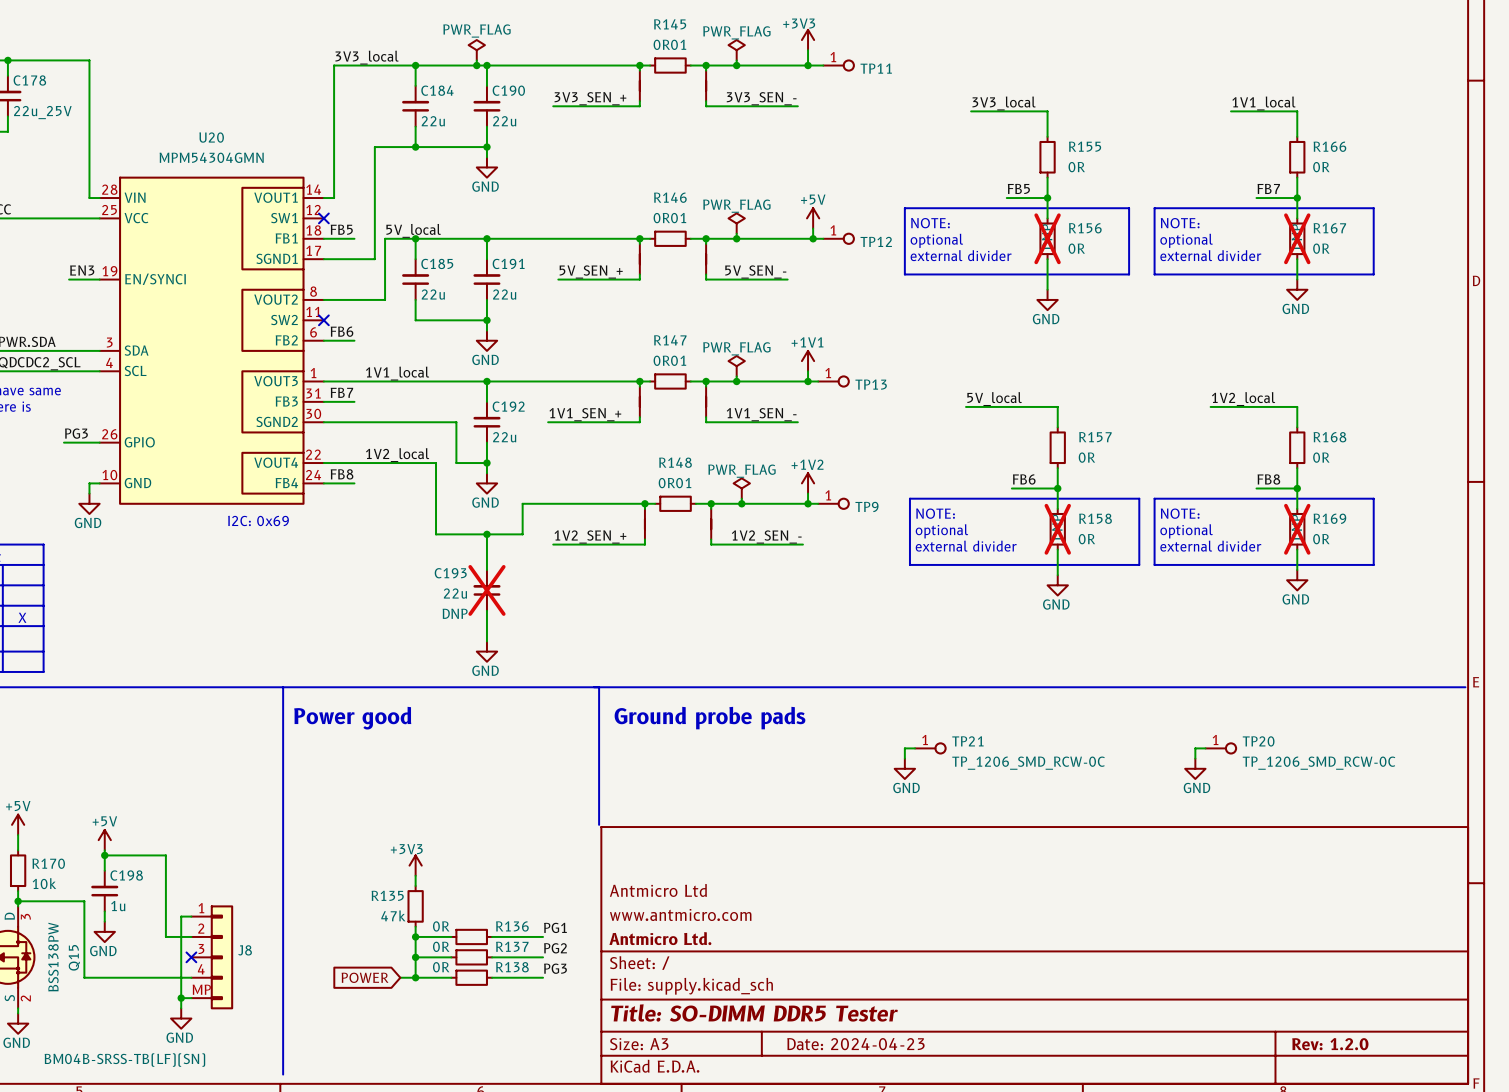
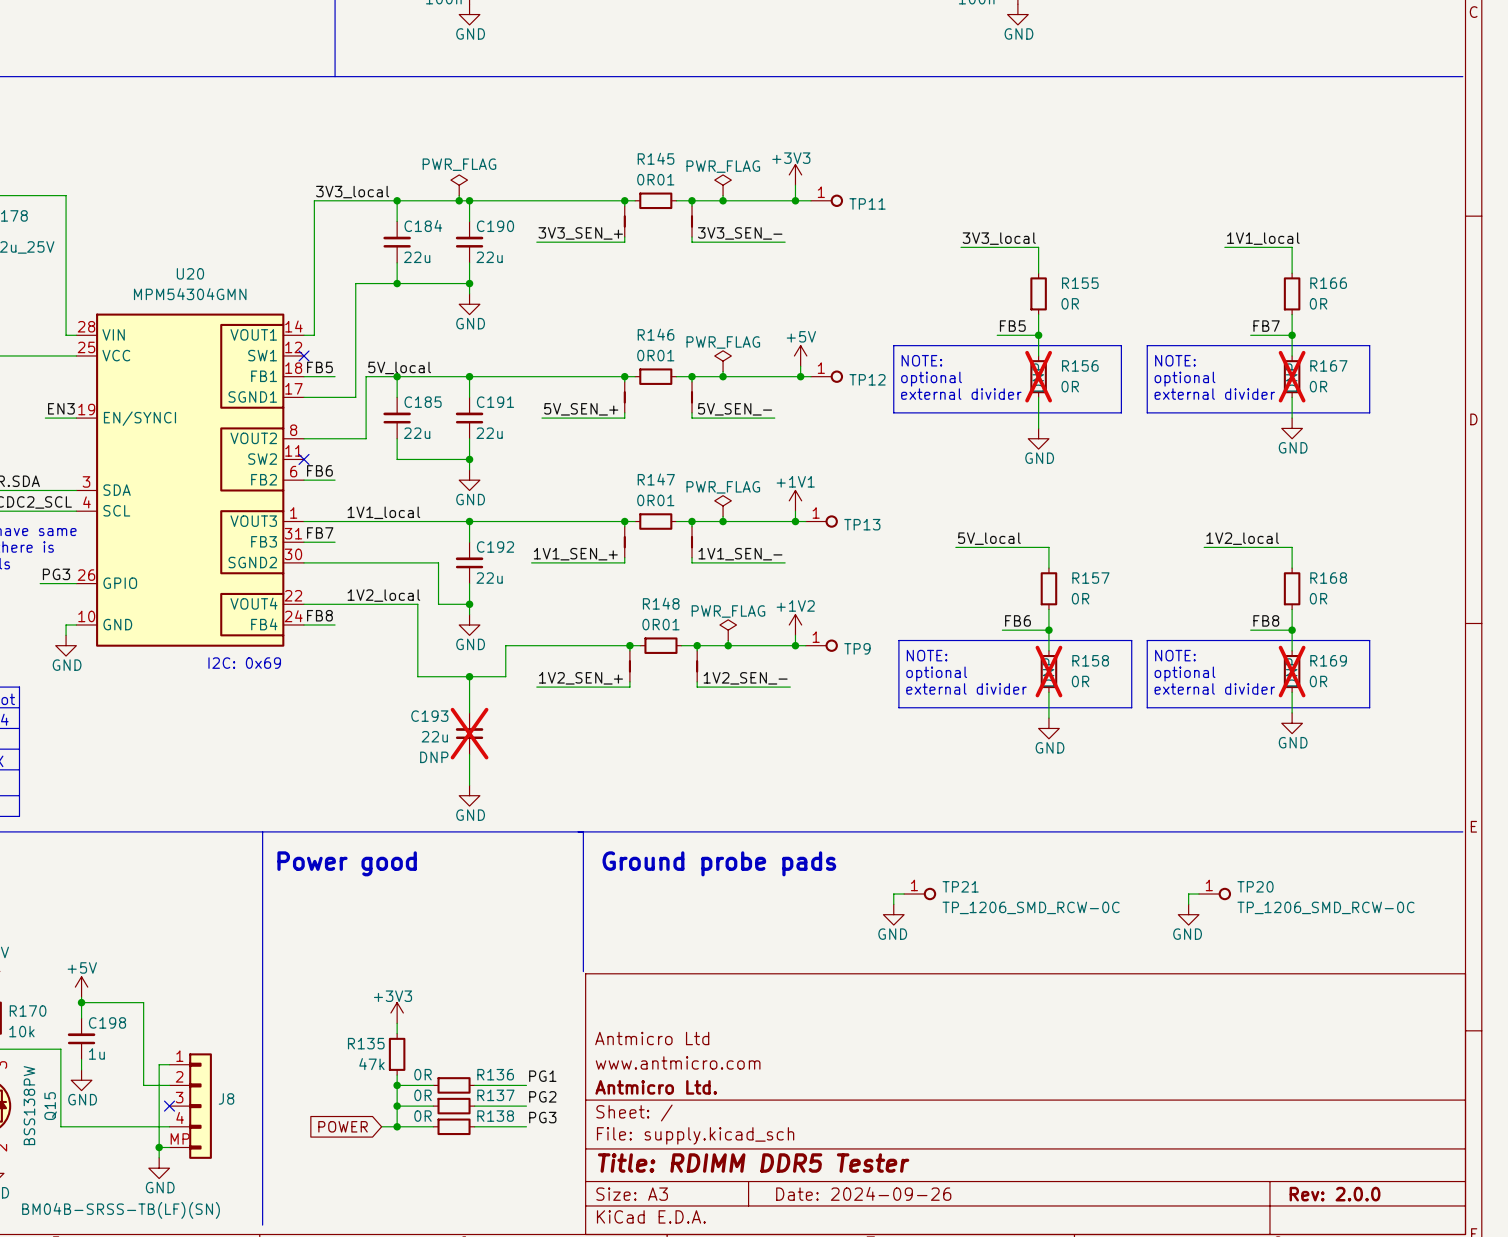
title block: Title: SO-DIMM DDR5 Tester (754, 1012) -> Title: RDIMM DDR5 Tester (753, 1163)
title block: Date: 2024-04-23 (855, 1044) -> Date: 2024-09-26 (863, 1193)
title block: Rev: 1.2.0 (1330, 1044) -> Rev: 2.0.0 (1335, 1194)

